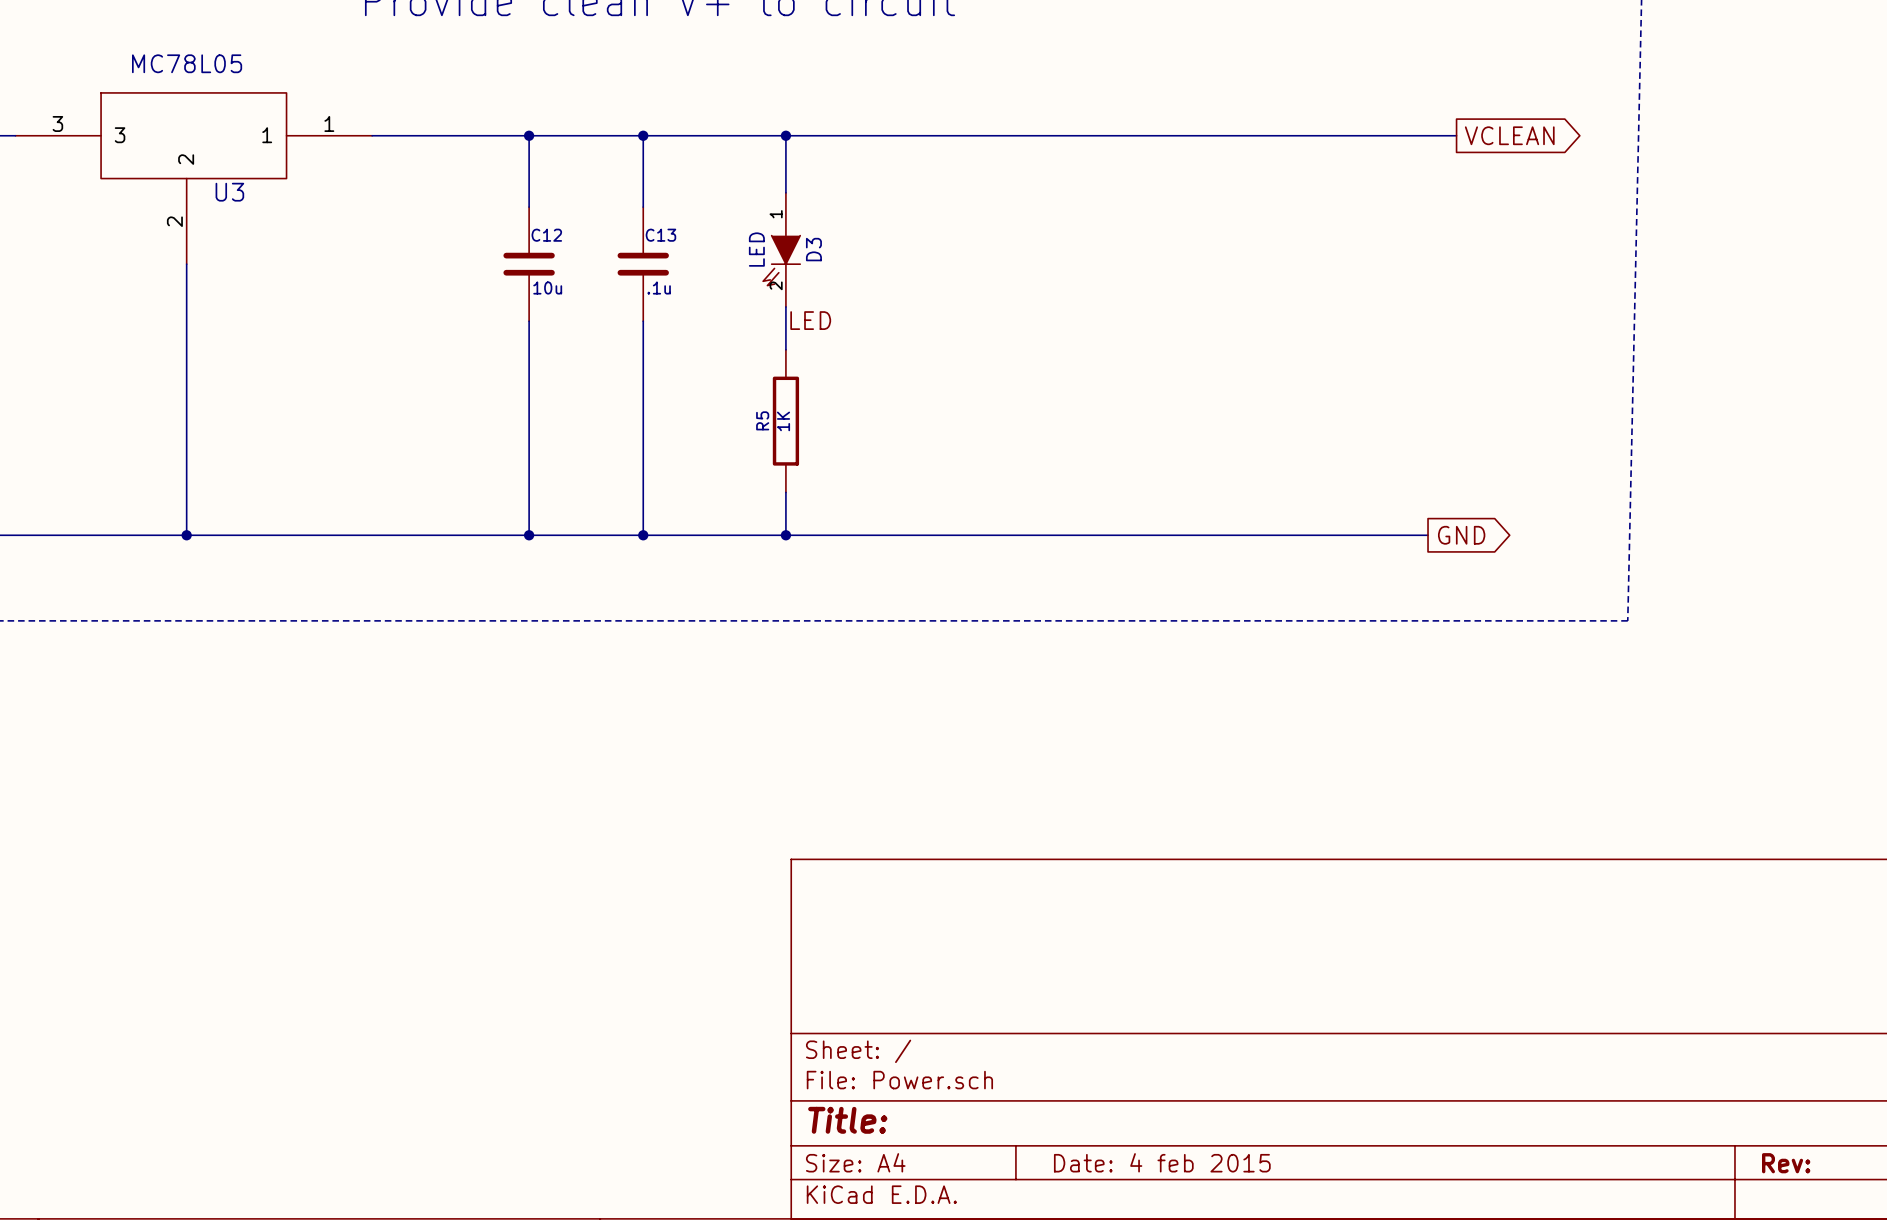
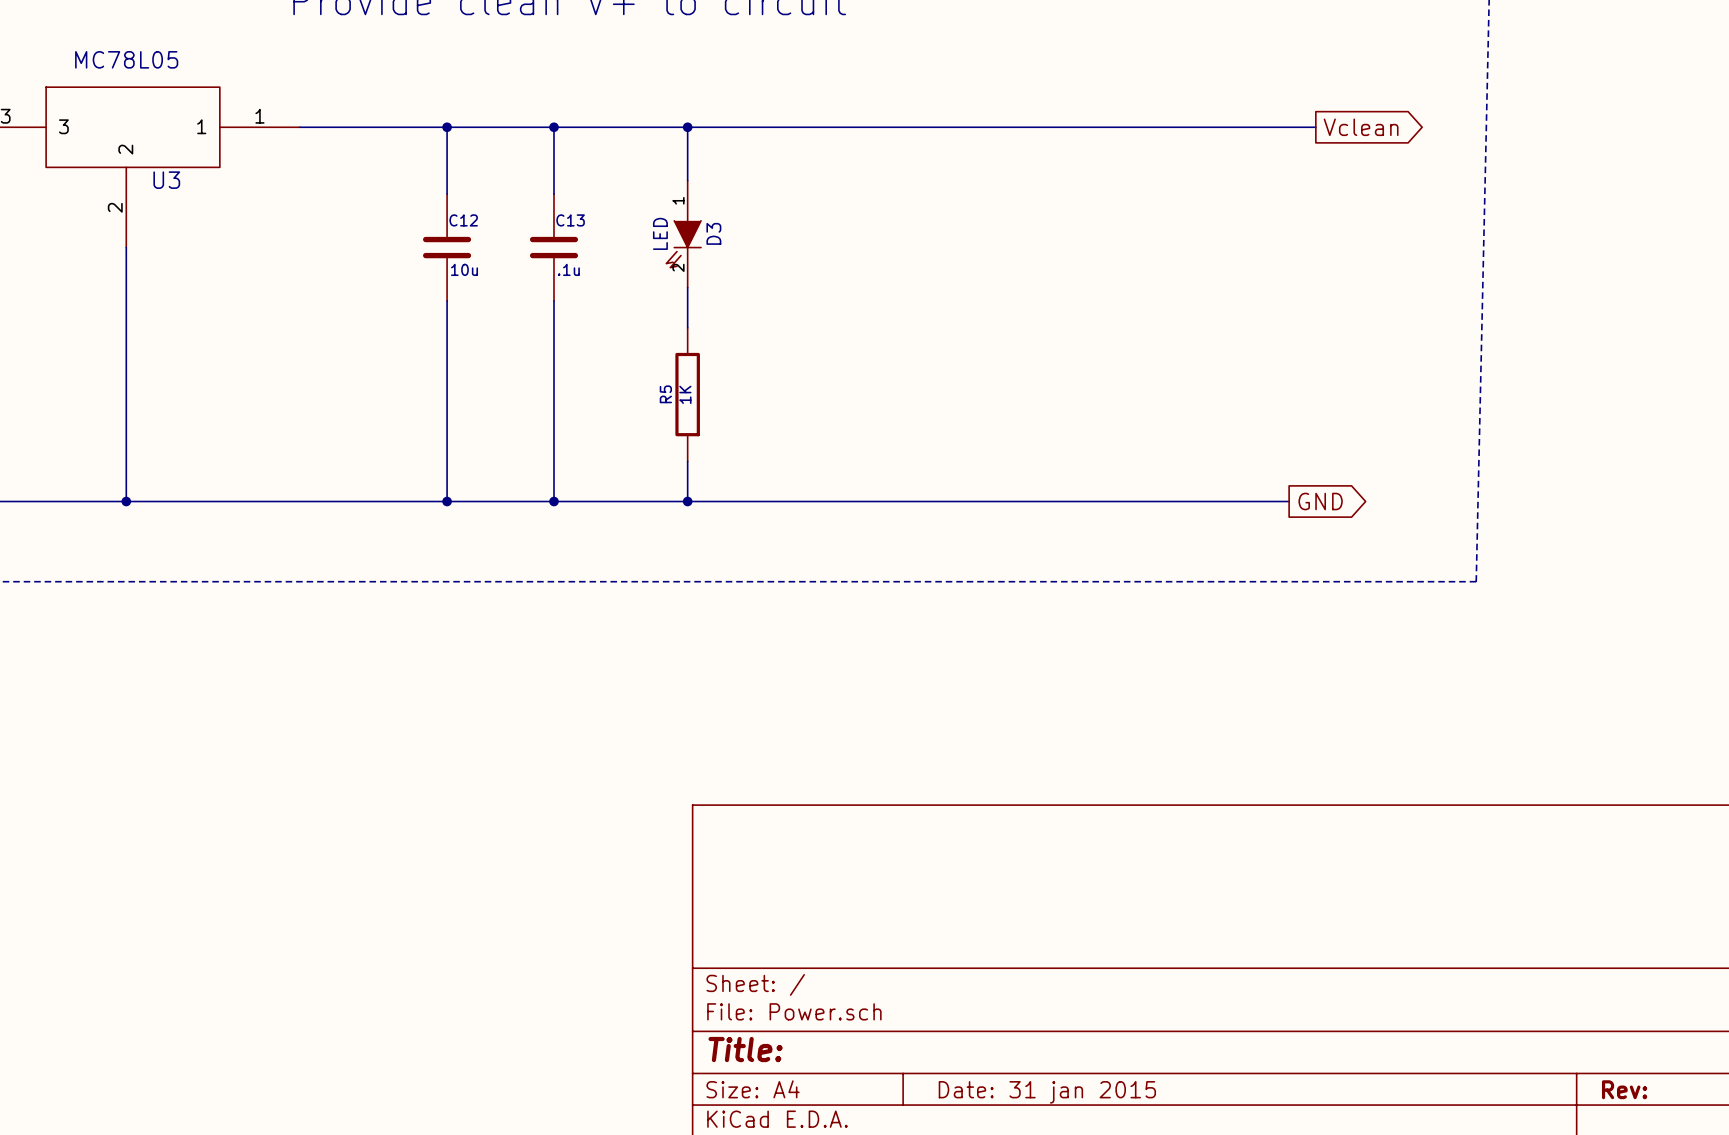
global label: VCLEAN (1509, 135) -> Vclean (1361, 127)
label: LED (810, 320) -> none
title block: Date: 4 feb 2015 (1162, 1162) -> Date: 31 jan 2015 (1047, 1092)

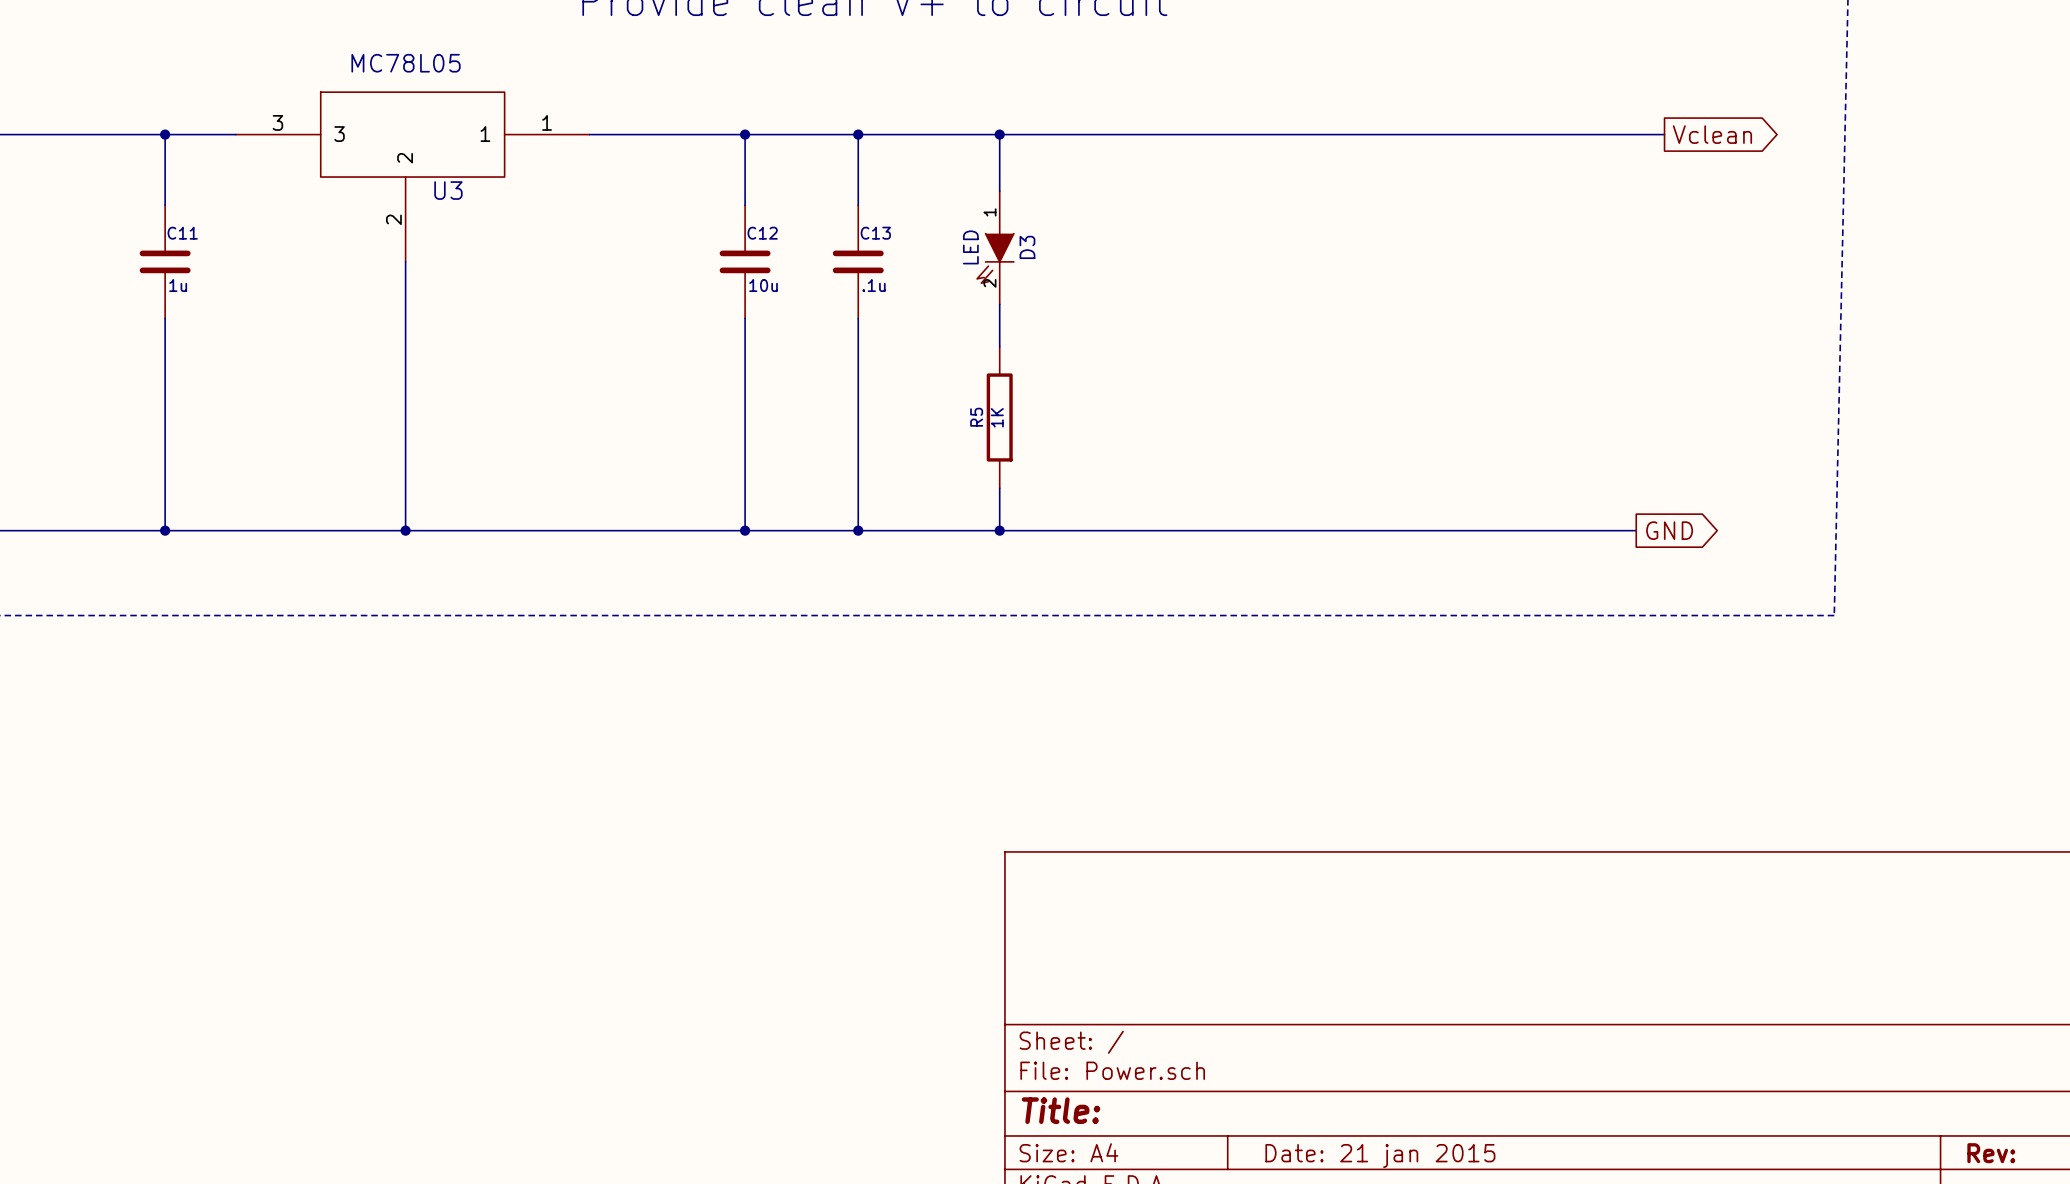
title block: Date: 31 jan 2015 (1047, 1092) -> Date: 21 jan 2015 (1380, 1155)

